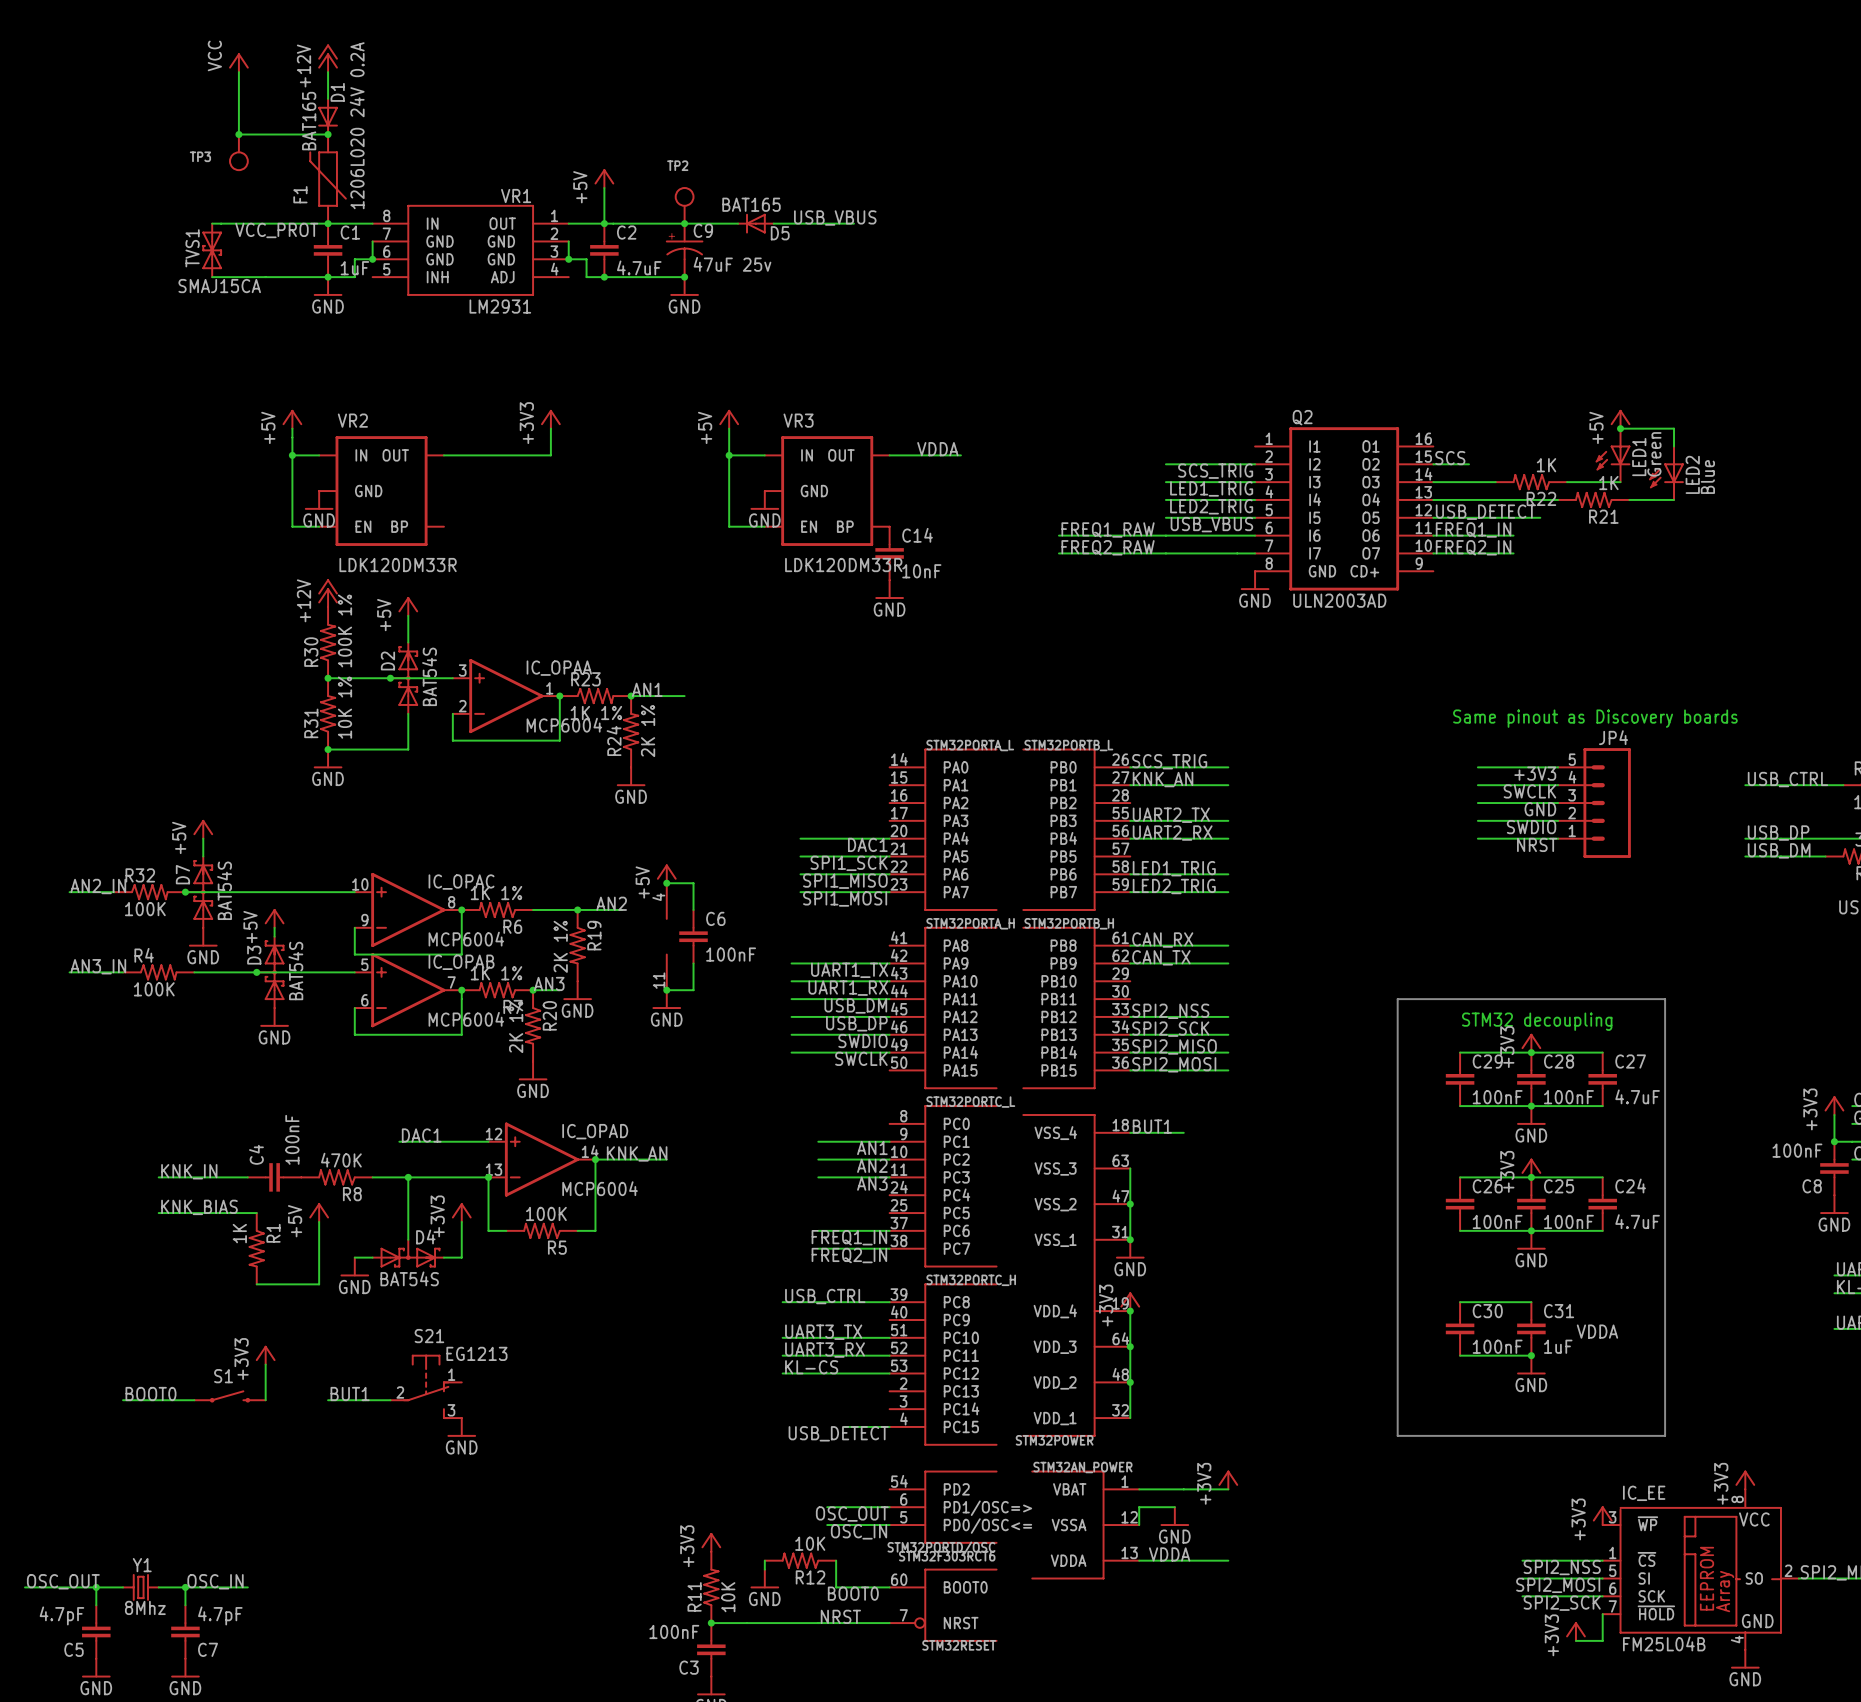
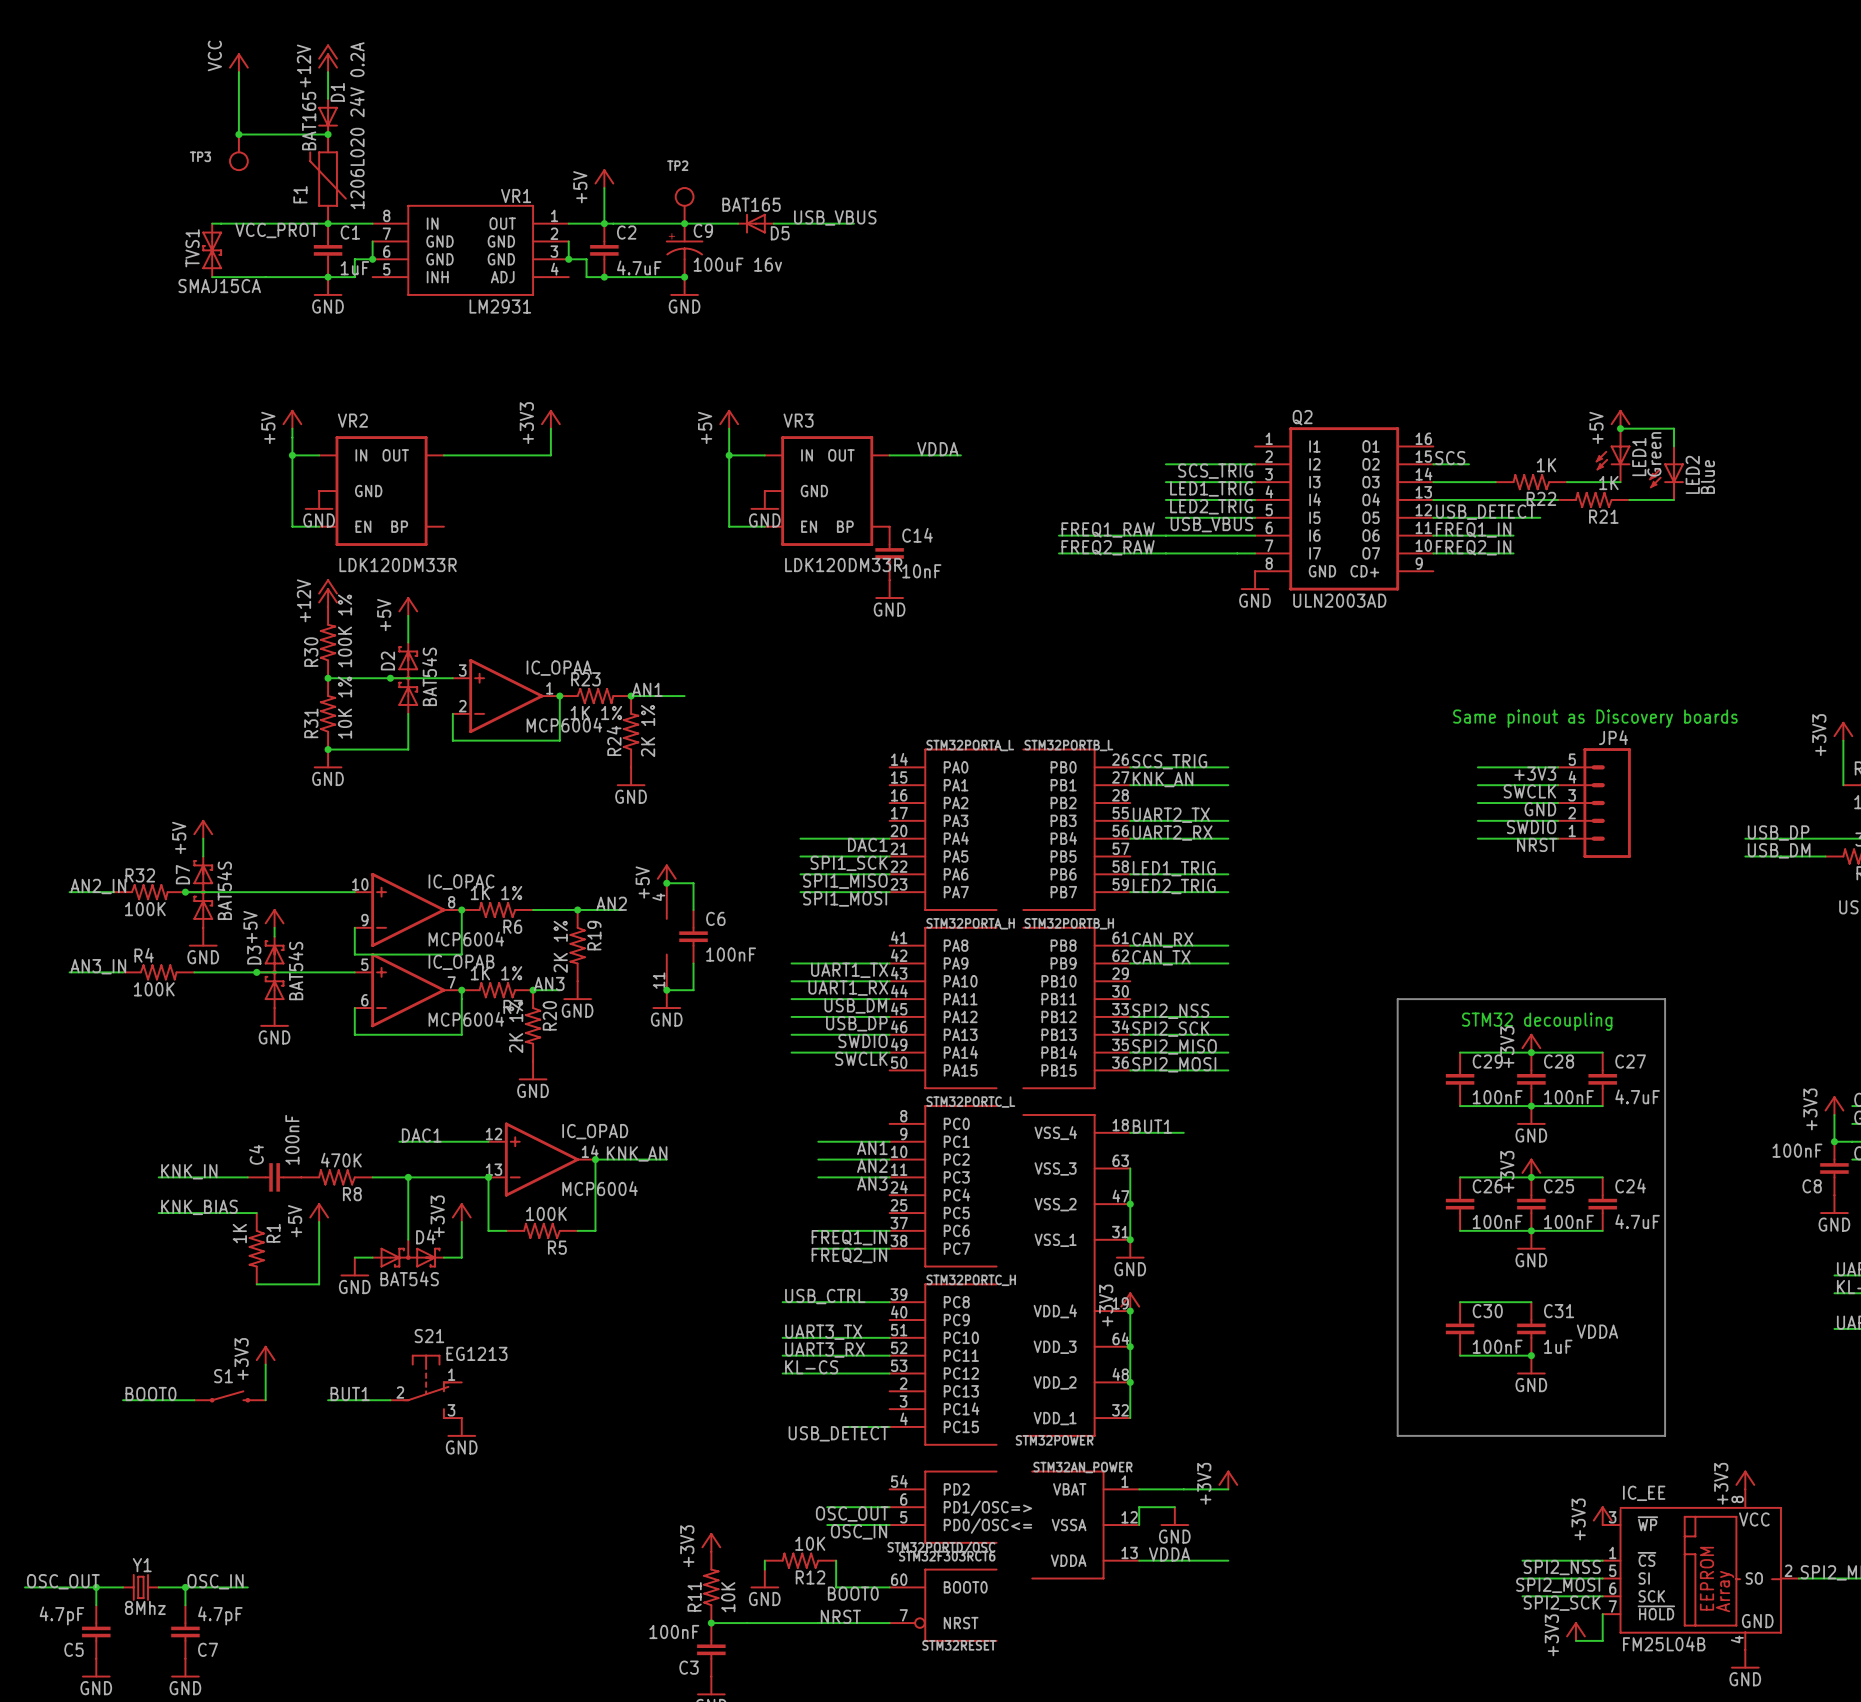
C9 value: 47uF 25v (732, 264) -> 100uF 16v (737, 264)
power symbol: none -> +3V3 (1843, 731)
label: USB_CTRL (1787, 779) -> none
wire: (1745, 785) (1843, 785) -> (1843, 740) (1843, 785)

